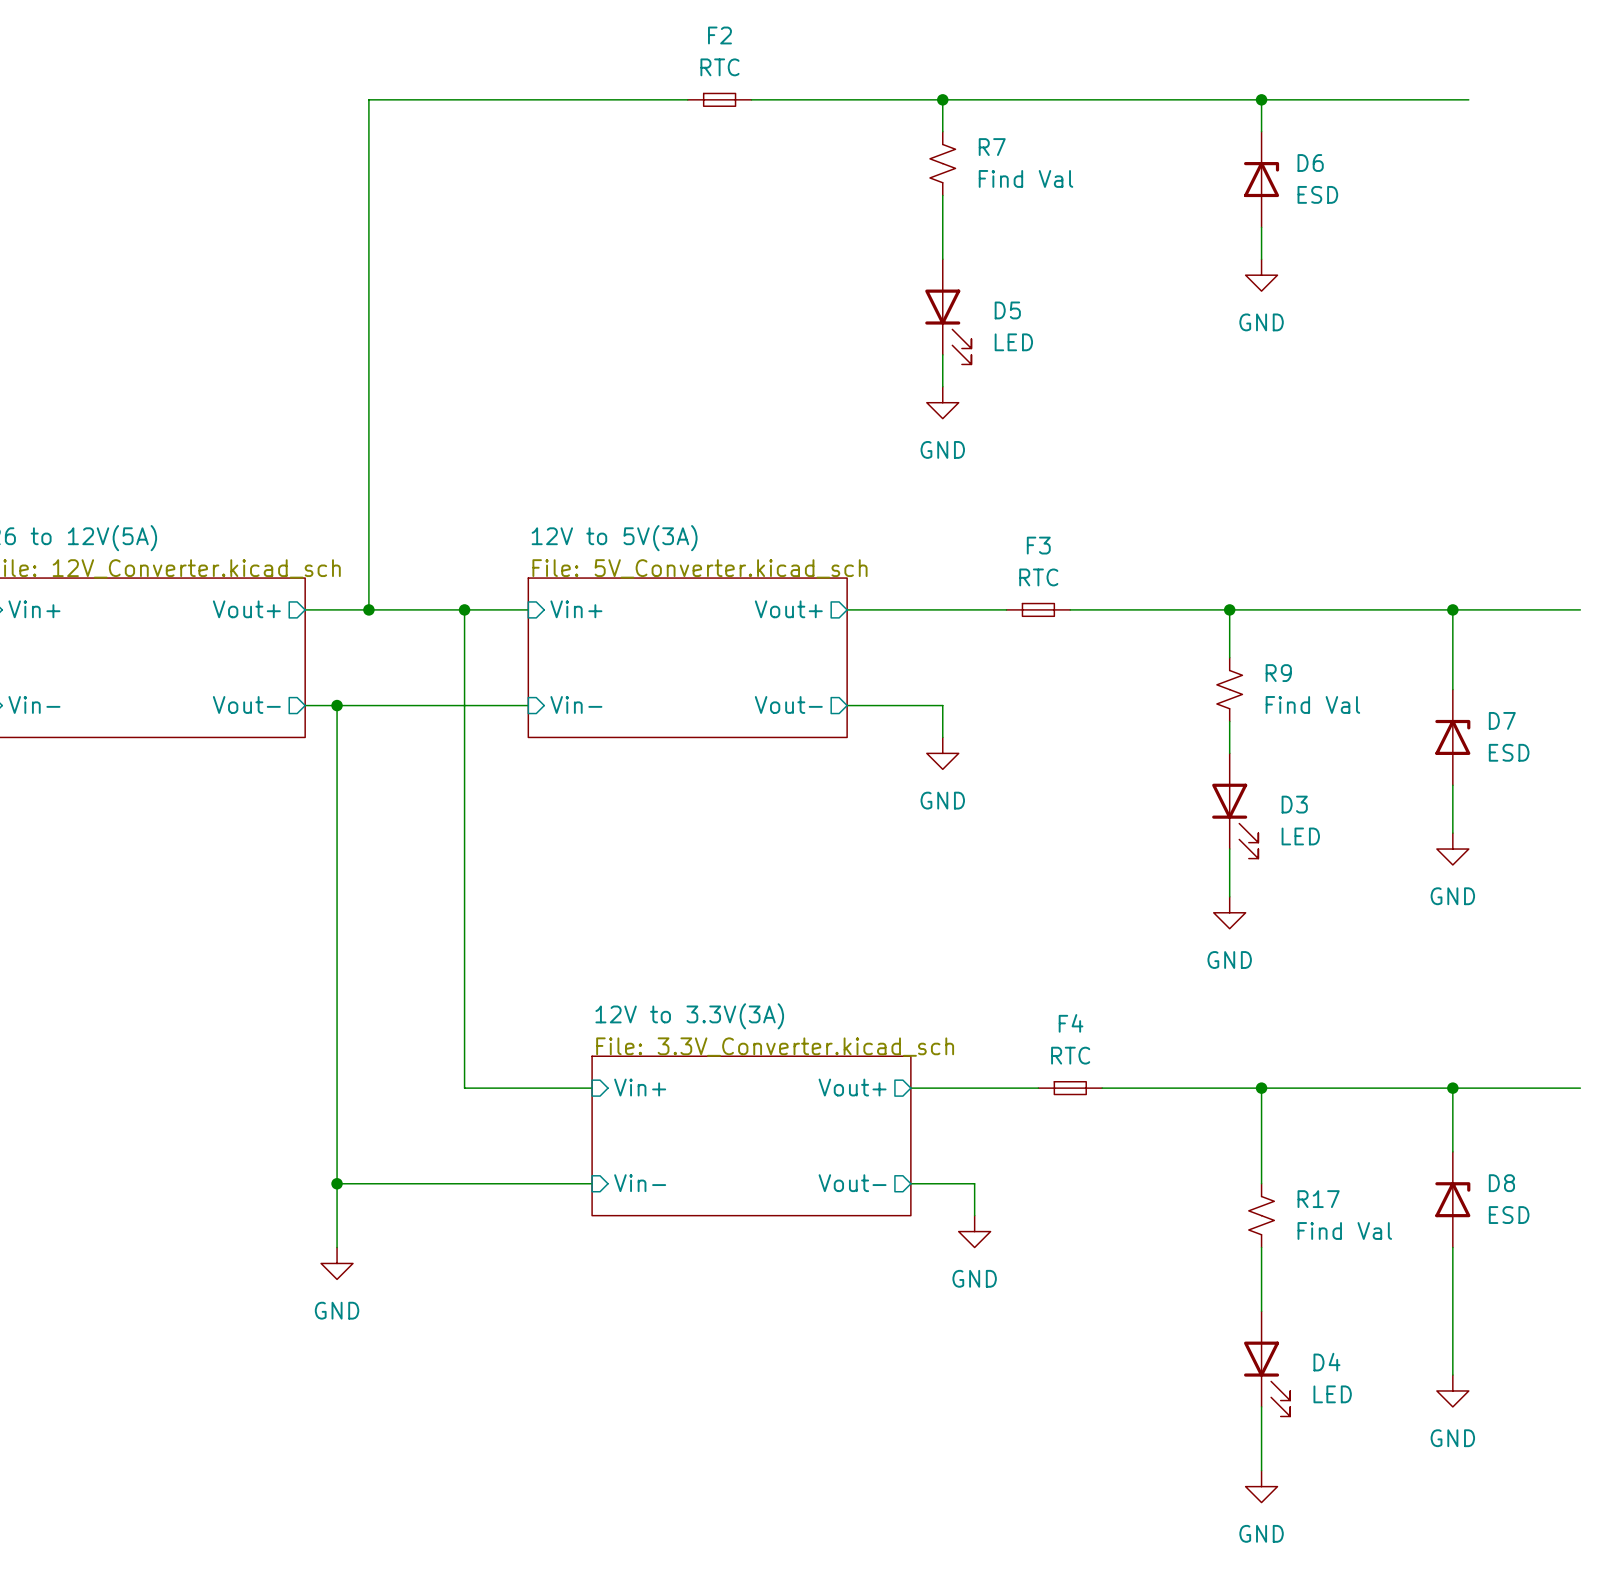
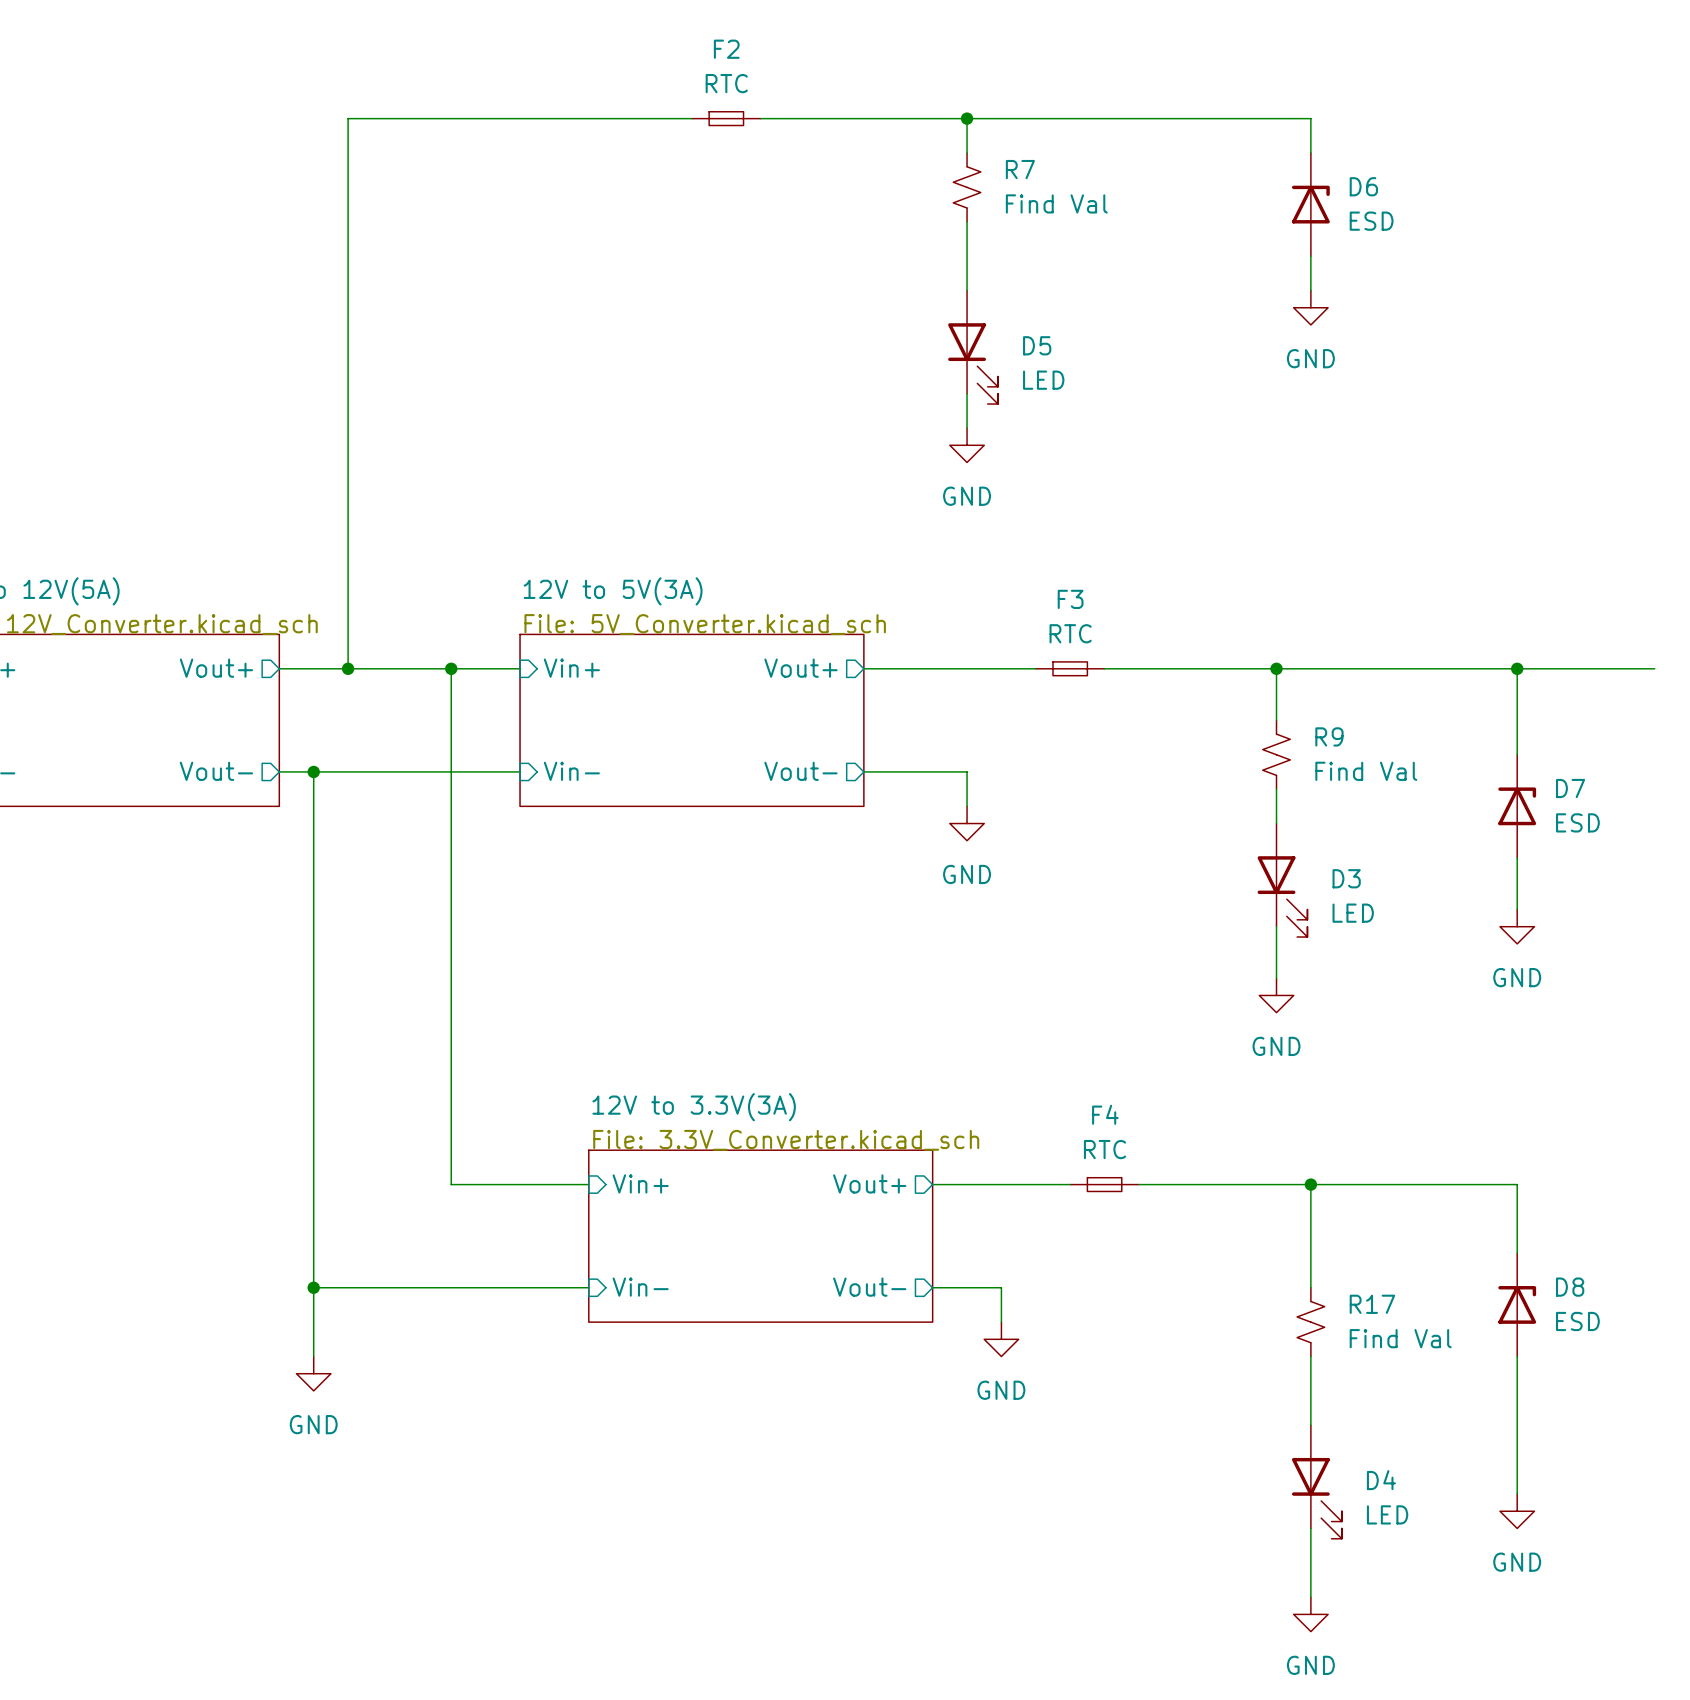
wire: (1261, 99) (1468, 99) -> none
junction: (1261, 99) -> none
wire: (1452, 1088) (1580, 1088) -> none
junction: (1452, 1088) -> none

